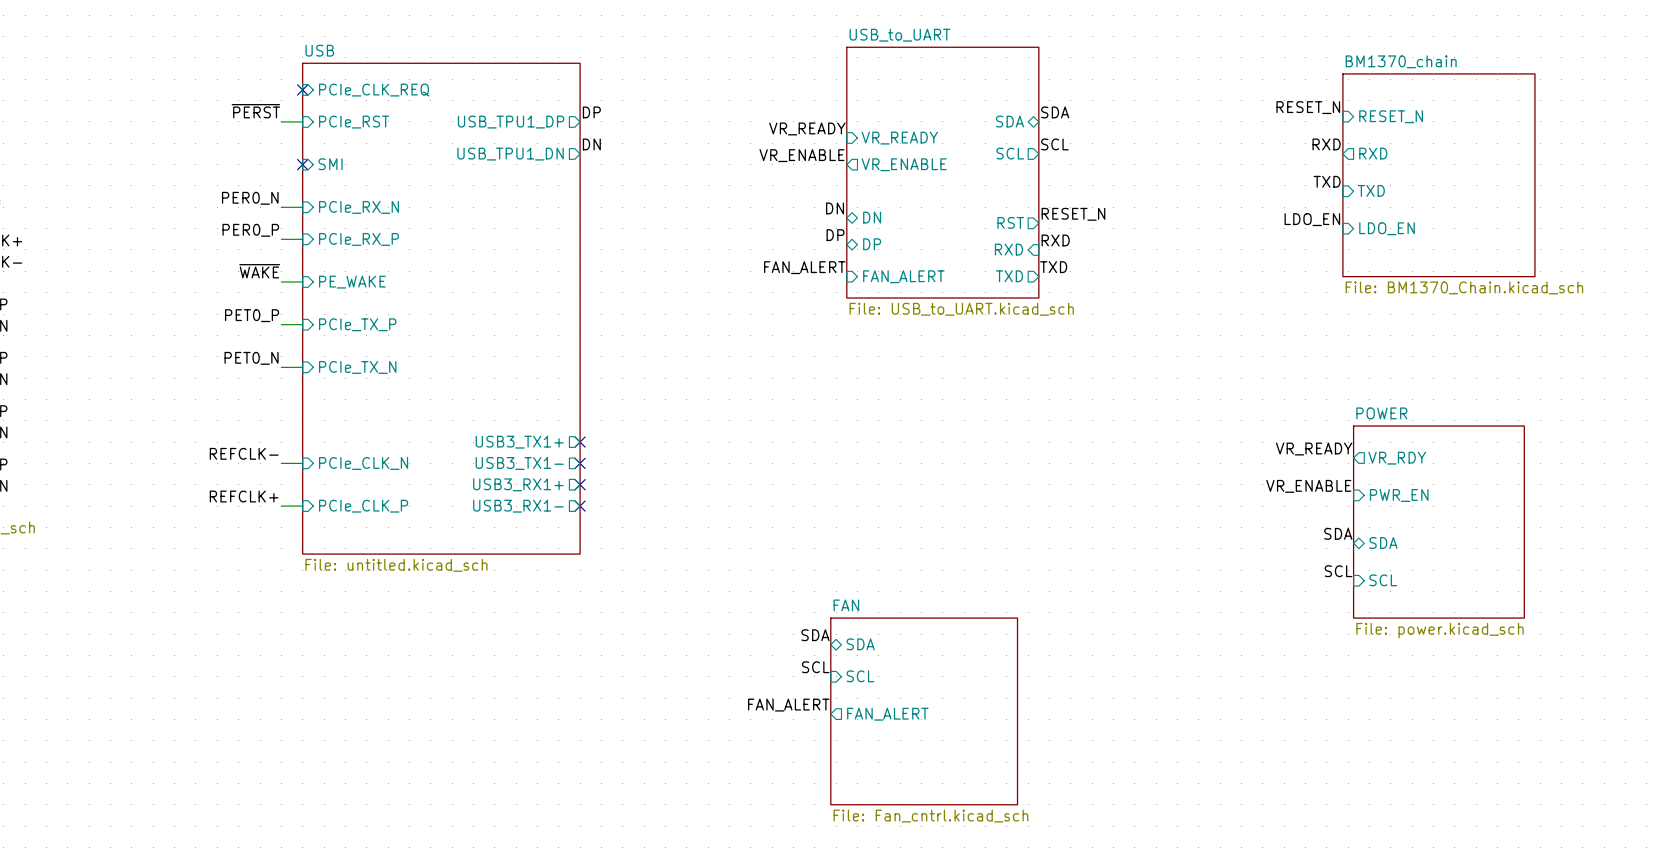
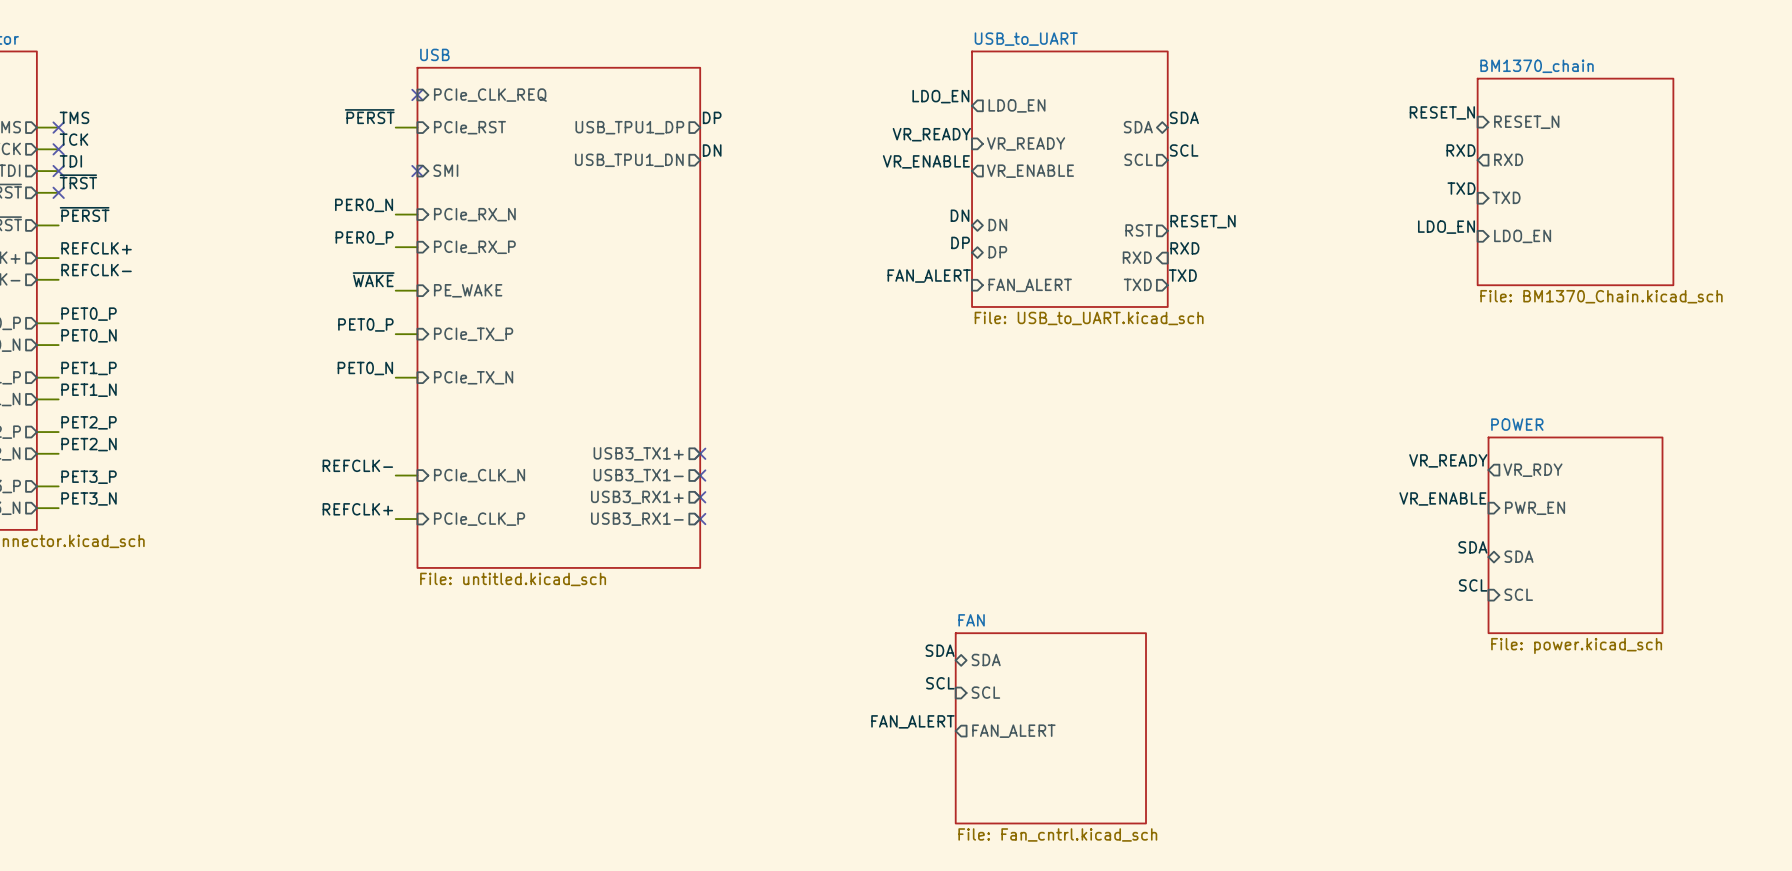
label: none -> LDO_EN (940, 96)
sheet pin: none -> LDO_EN (1016, 105)

